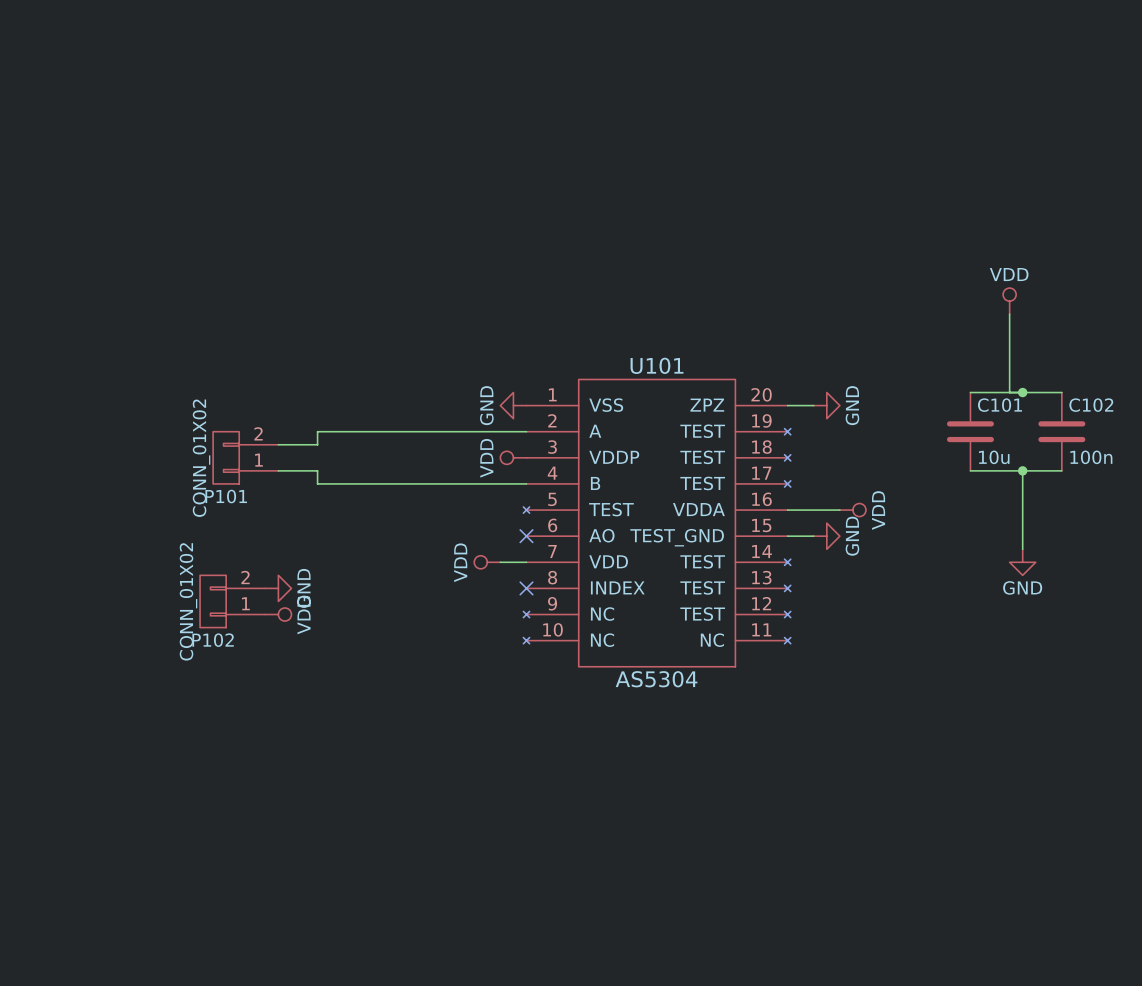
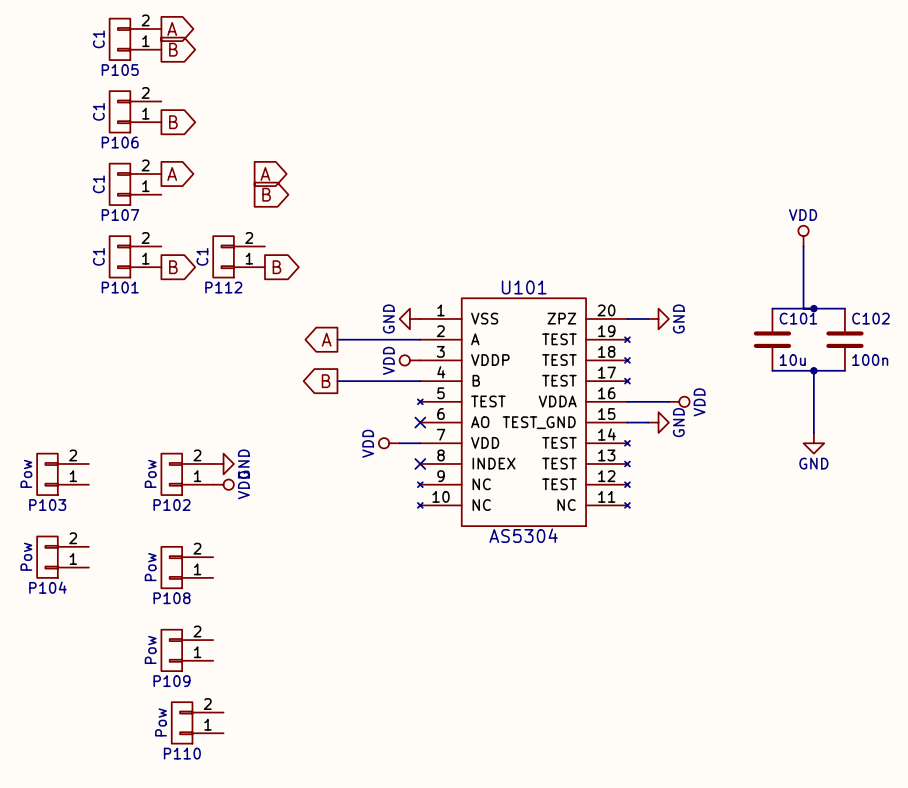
global label: none -> A (172, 28)
P105: none -> C1 (135, 39)
global label: none -> B (173, 49)
P106: none -> C1 (135, 111)
global label: none -> B (173, 122)
global label: none -> A (172, 173)
global label: none -> A (265, 173)
P107: none -> C1 (135, 184)
global label: none -> B (266, 194)
P112: none -> C1 (239, 256)
global label: none -> B (173, 267)
global label: none -> B (276, 267)
global label: none -> A (326, 339)
wire: (422, 431) (317, 431) (317, 444) (278, 444) -> none
P101 position: (245, 457) -> (135, 256)
P101 value: CONN_01X02 (201, 458) -> C1 (98, 256)
wire: (278, 470) (317, 470) (317, 483) (422, 483) -> none
global label: none -> B (326, 381)
P103: none -> Pow (63, 474)
P102 value: CONN_01X02 (188, 601) -> Pow (150, 473)
P104: none -> Pow (63, 557)
P108: none -> Pow (187, 567)
P109: none -> Pow (187, 650)
P110: none -> Pow (197, 722)

